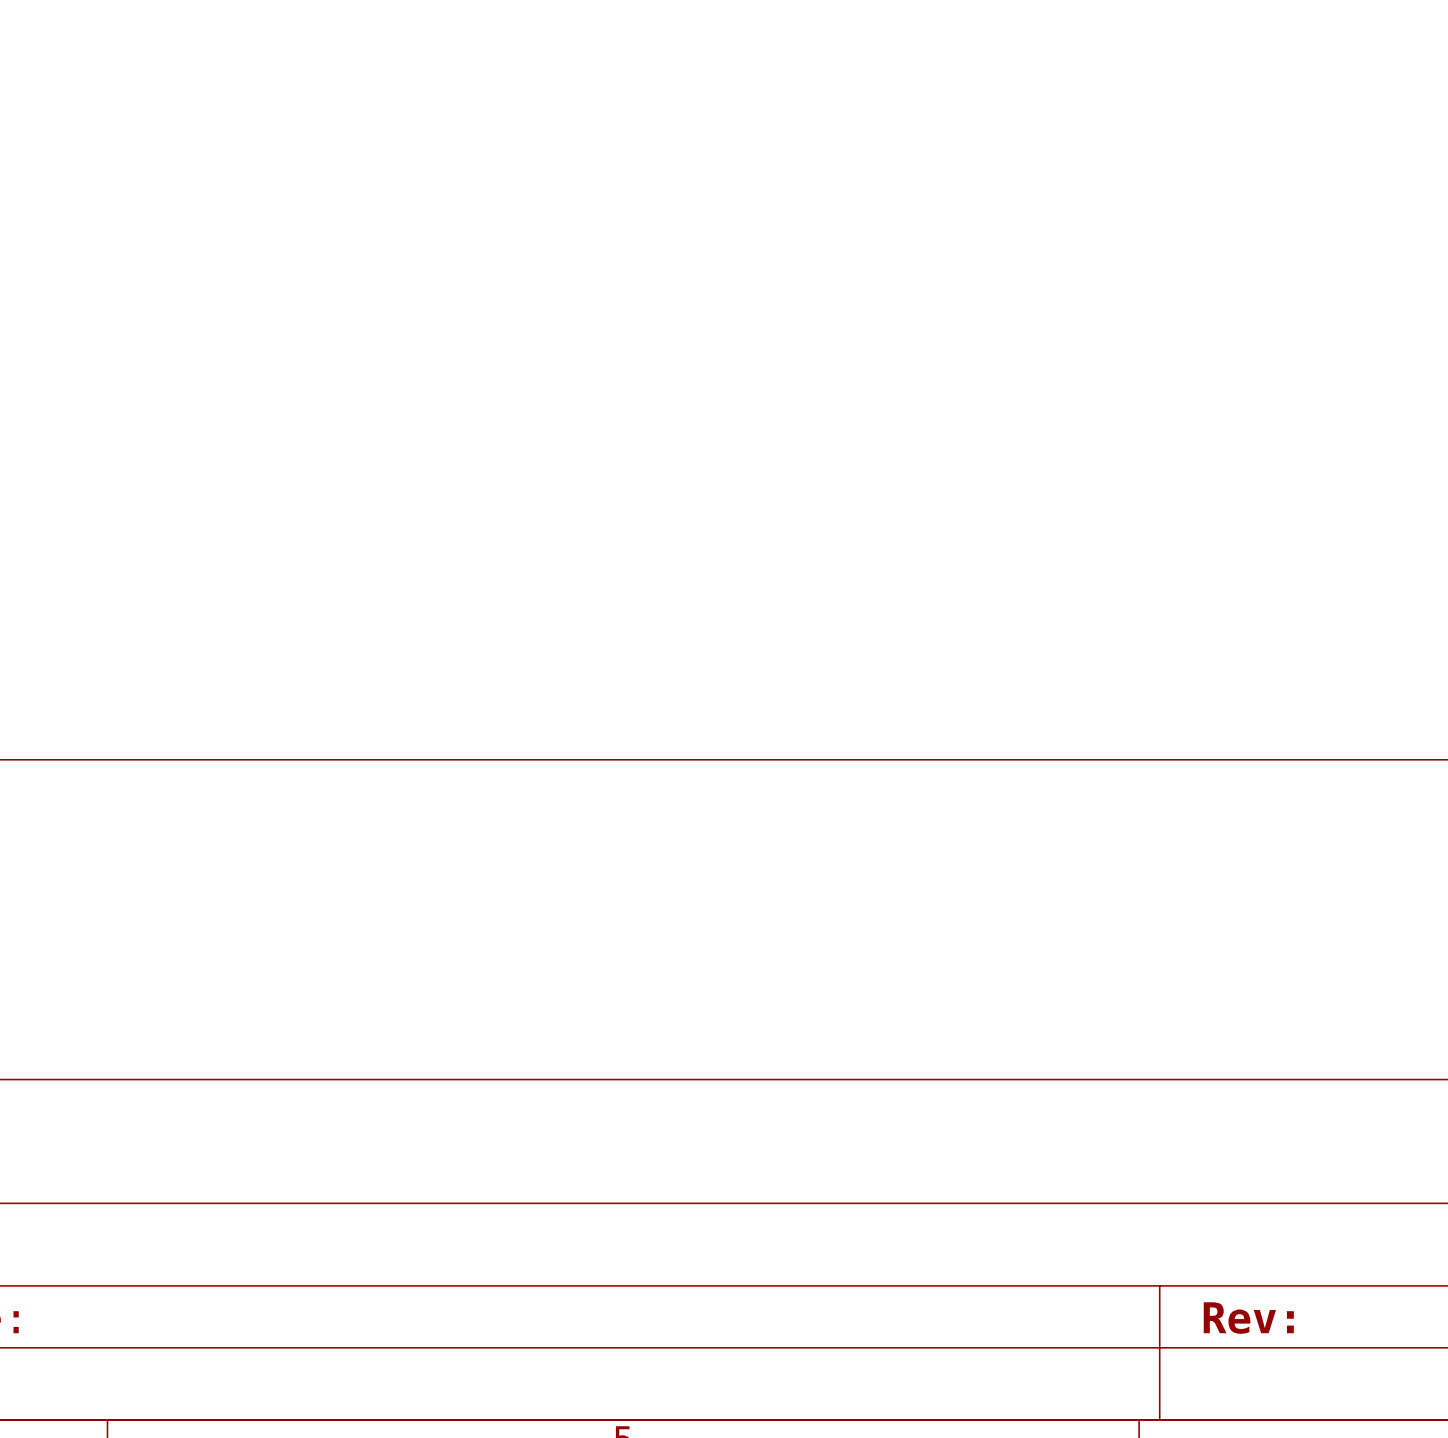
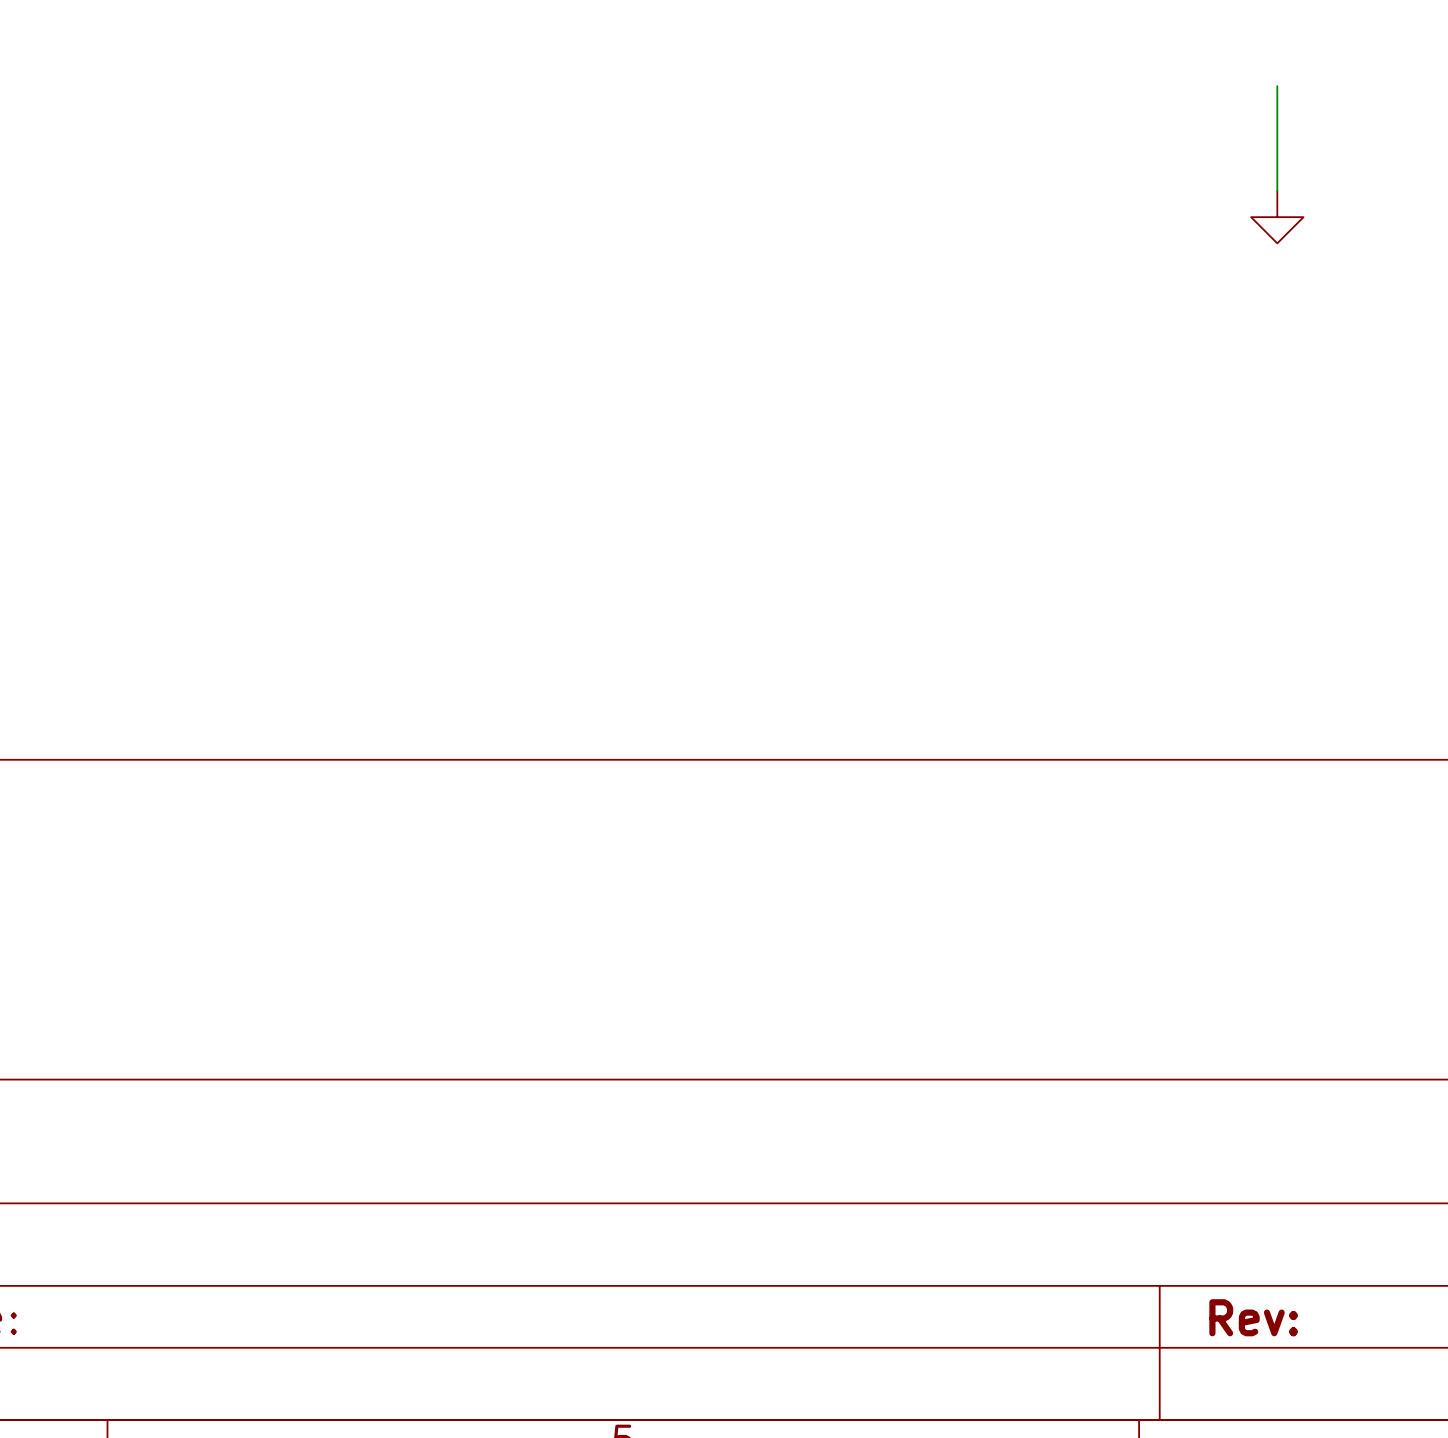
wire: none -> (1277, 86) (1277, 190)
power symbol: none -> (1277, 217)

